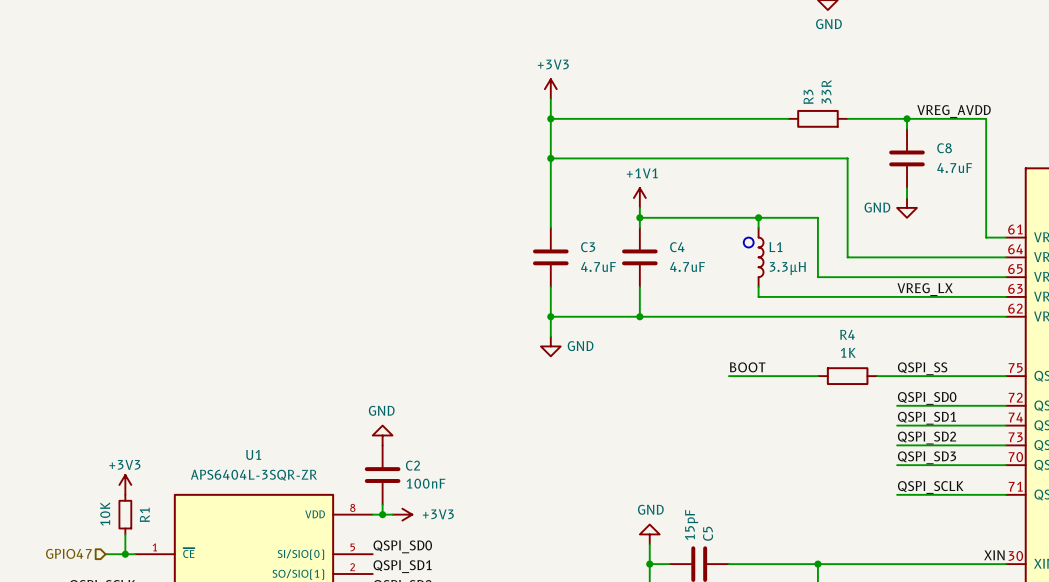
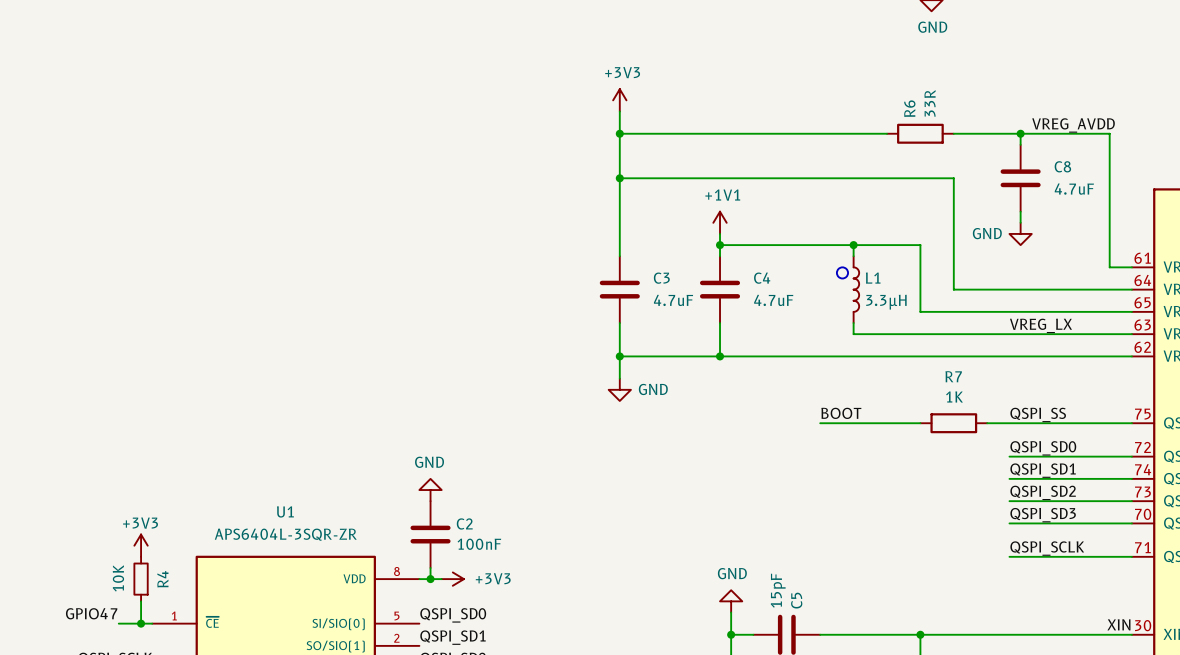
R3 name: R3 (808, 96) -> R6 (909, 108)
R4 name: R4 (847, 334) -> R7 (953, 376)
R1 name: R1 (144, 514) -> R4 (162, 579)
label: none -> GPIO47 (91, 613)
hierarchical label: GPIO47 (68, 553) -> none

